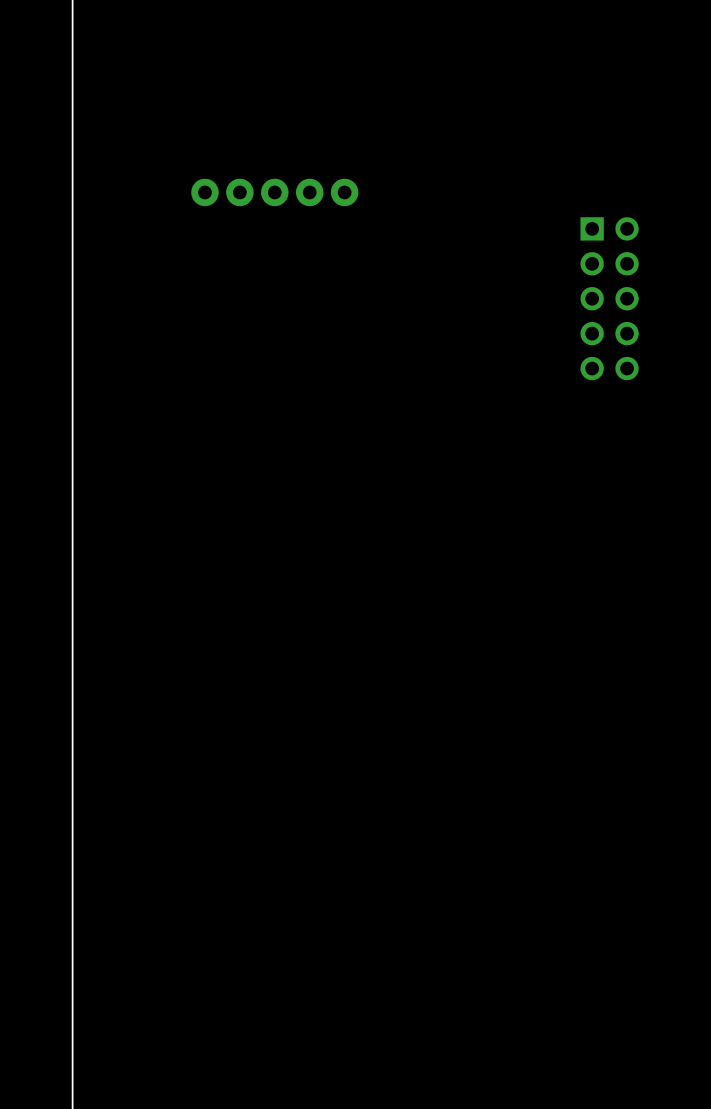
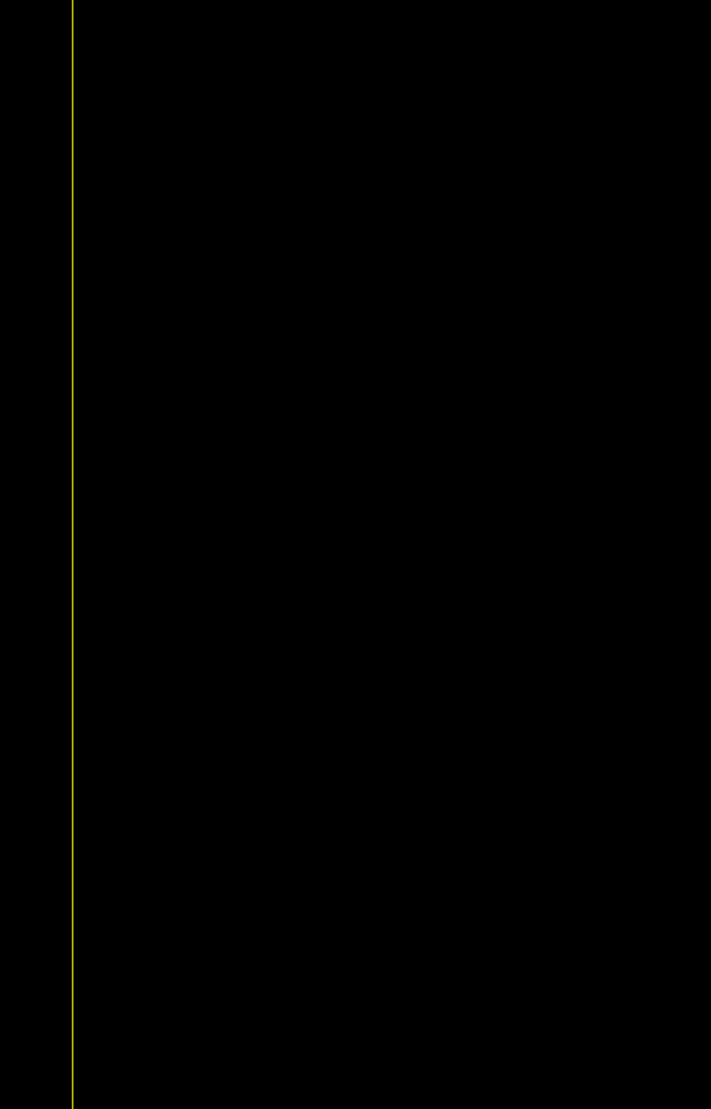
part: (274, 192) -> none
part: (609, 298) -> none

